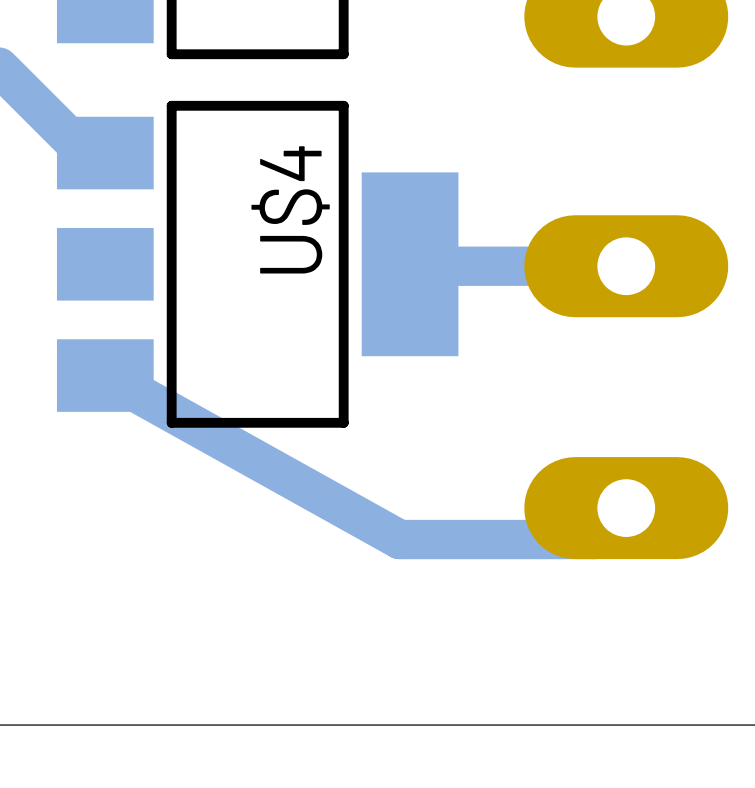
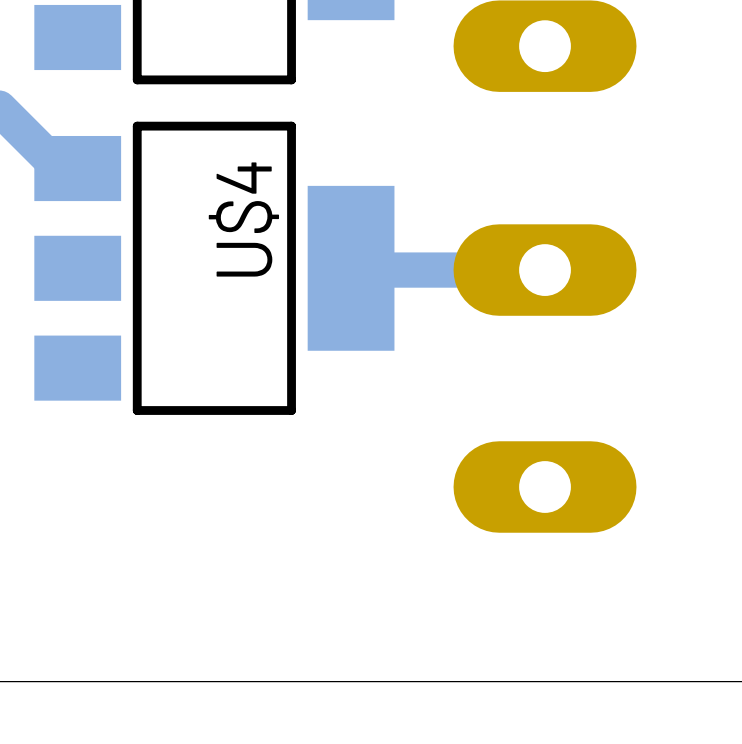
track: (105, 375) (399, 539) (594, 539) (626, 508) -> none

